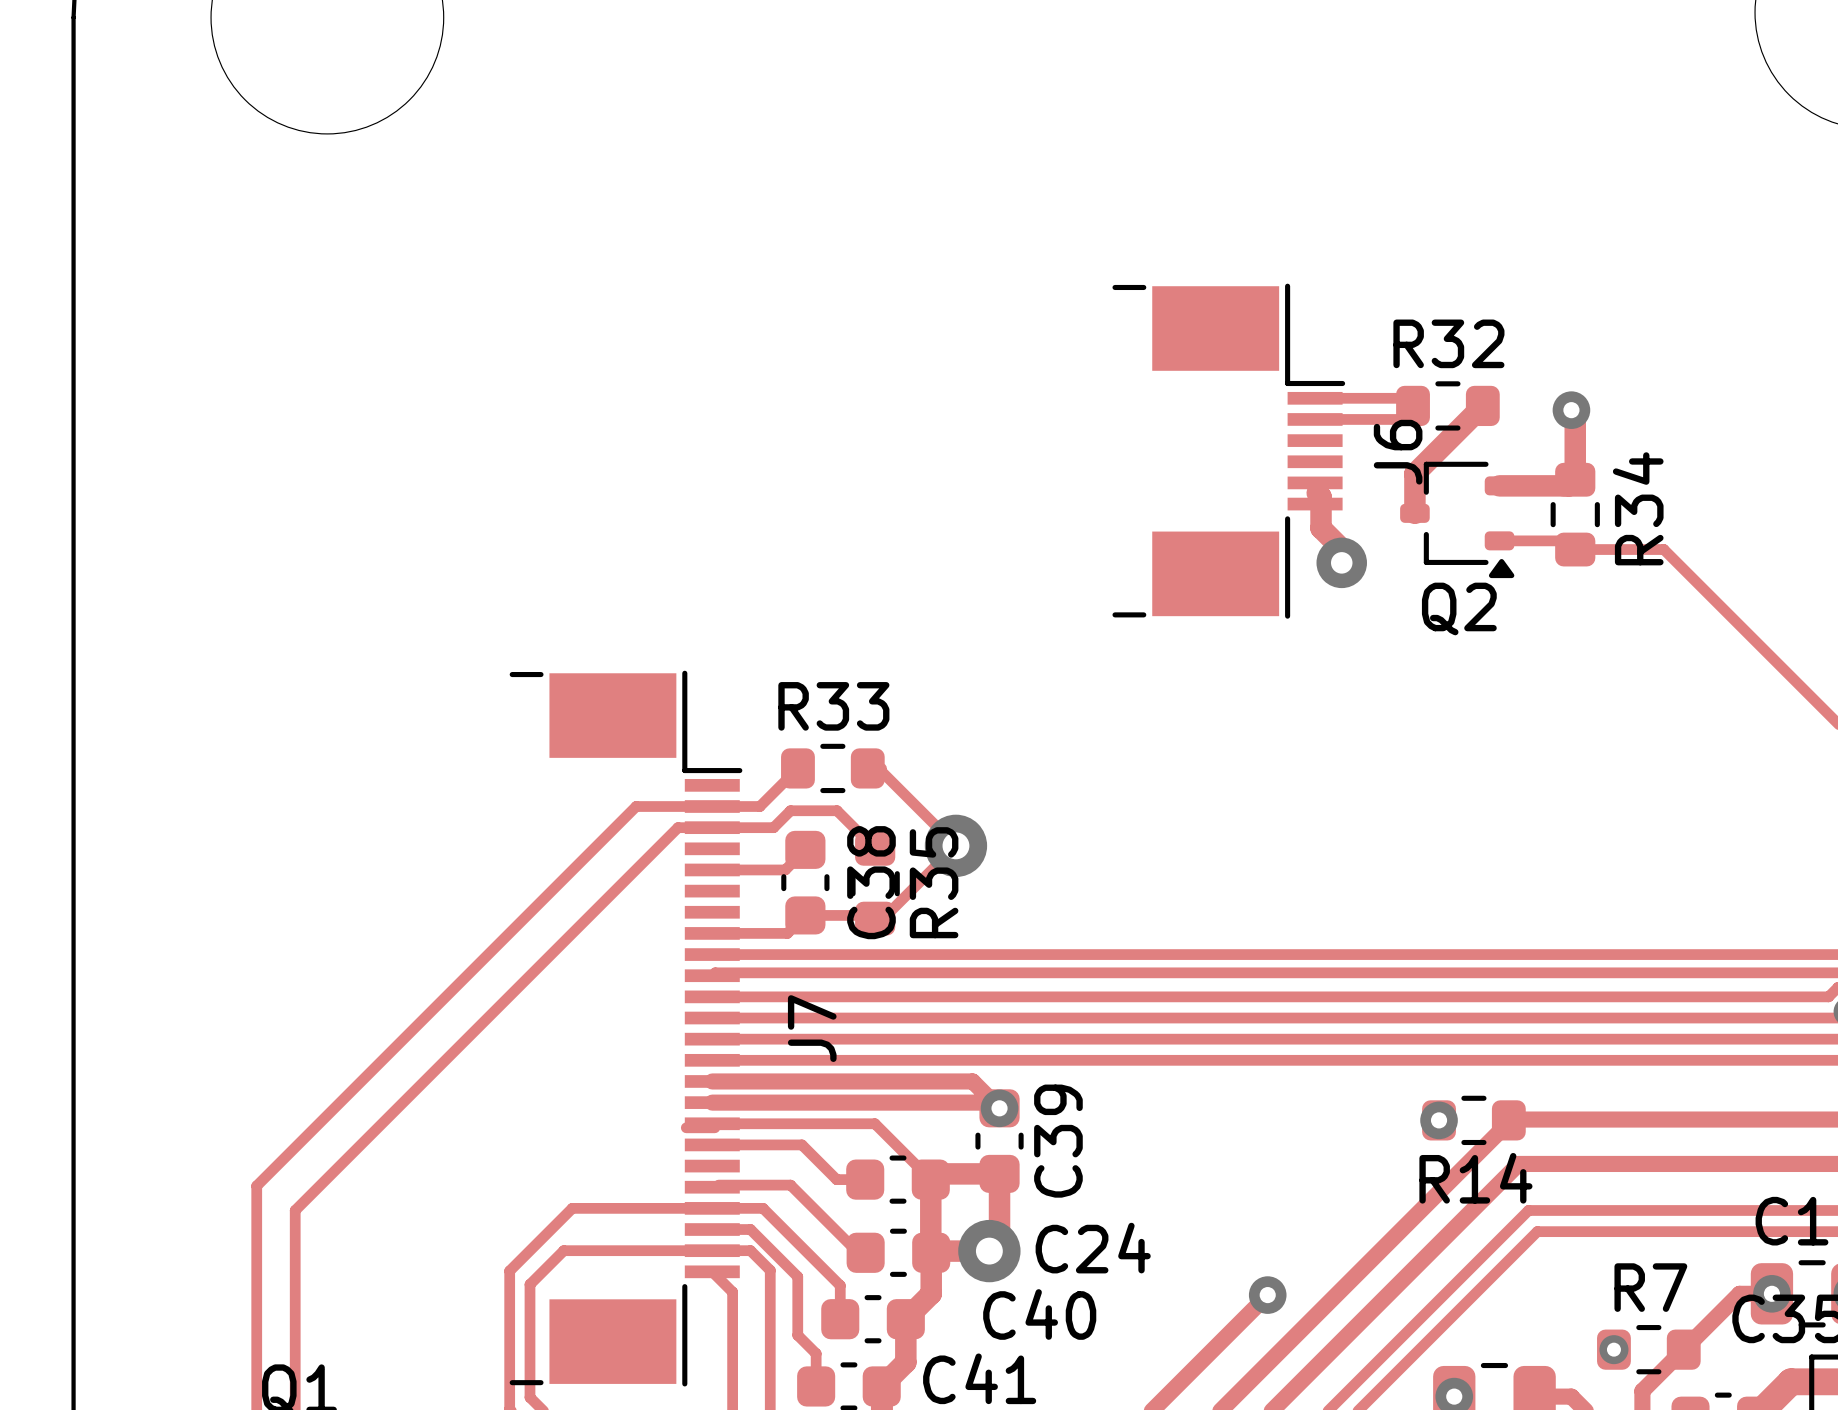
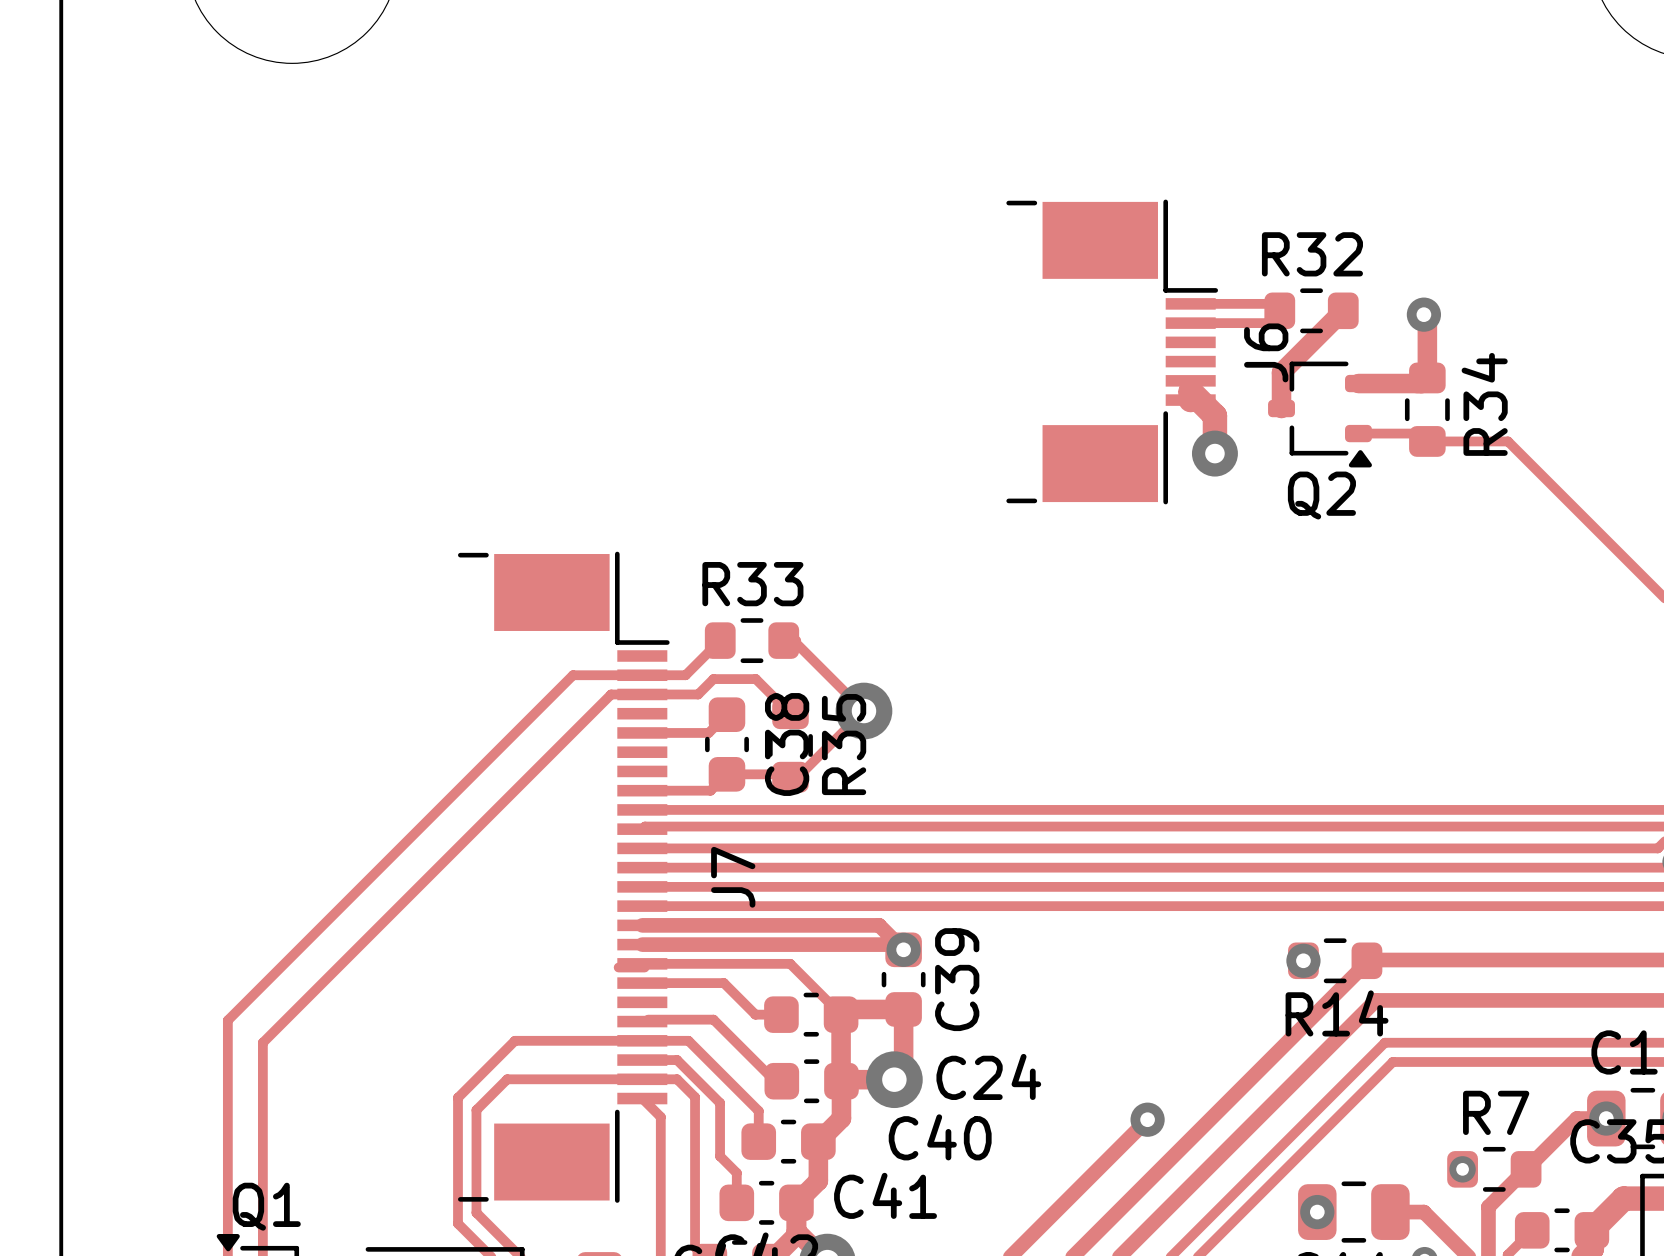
track: (1317, 493) (1321, 496) (1321, 528) (1341, 548) -> none
track: none -> (1190, 400) (1190, 391) (1214, 415) (1214, 453)

